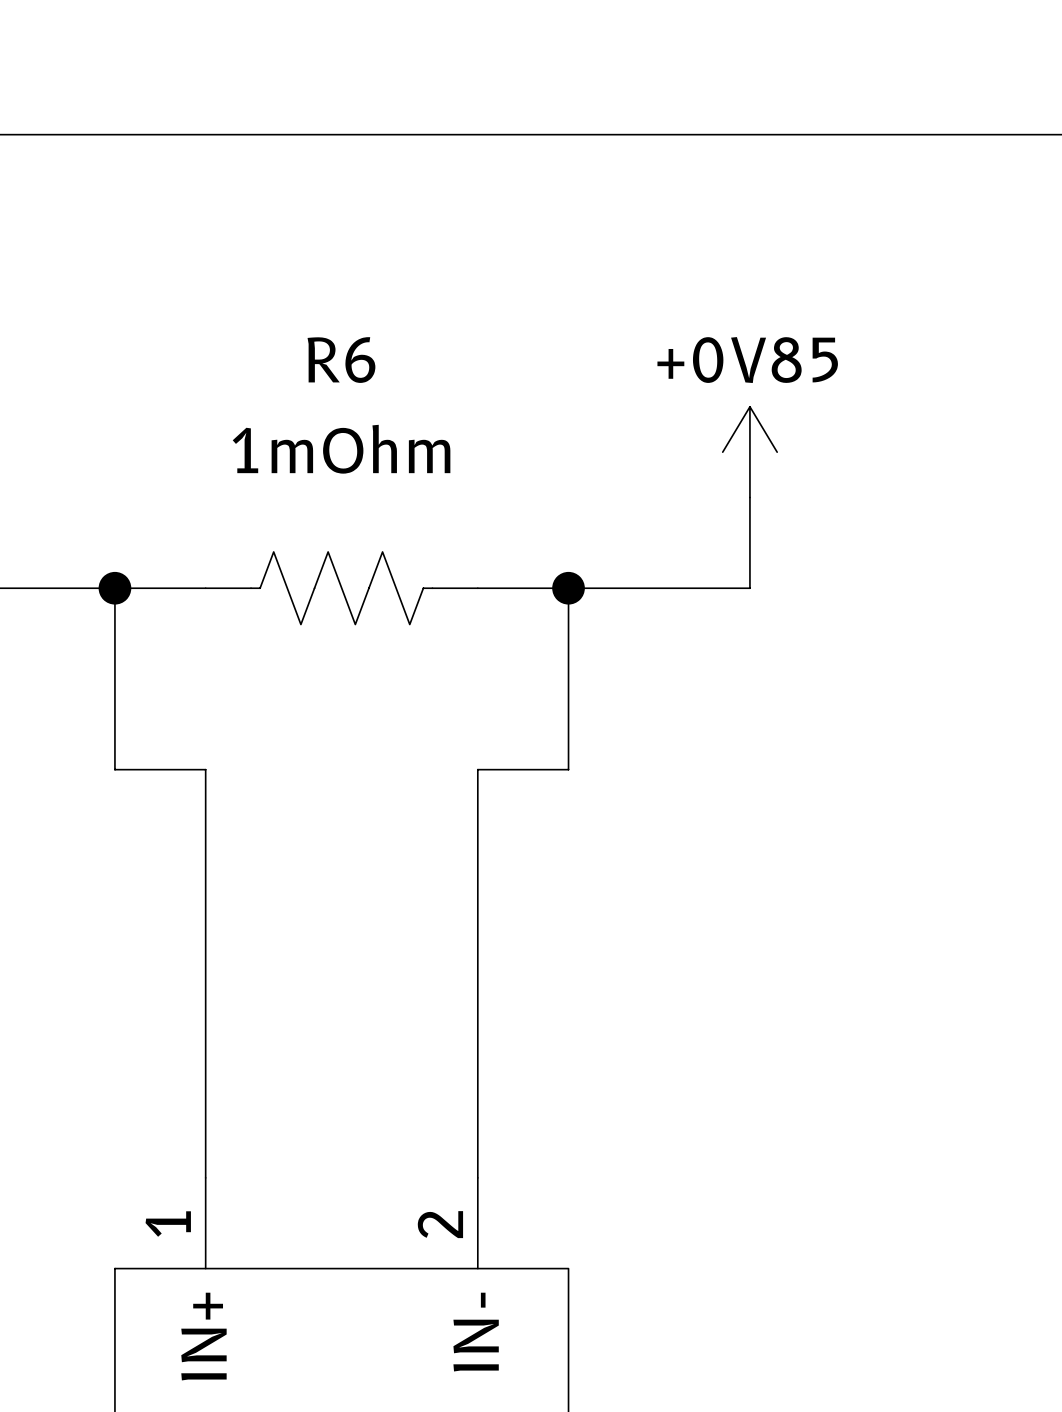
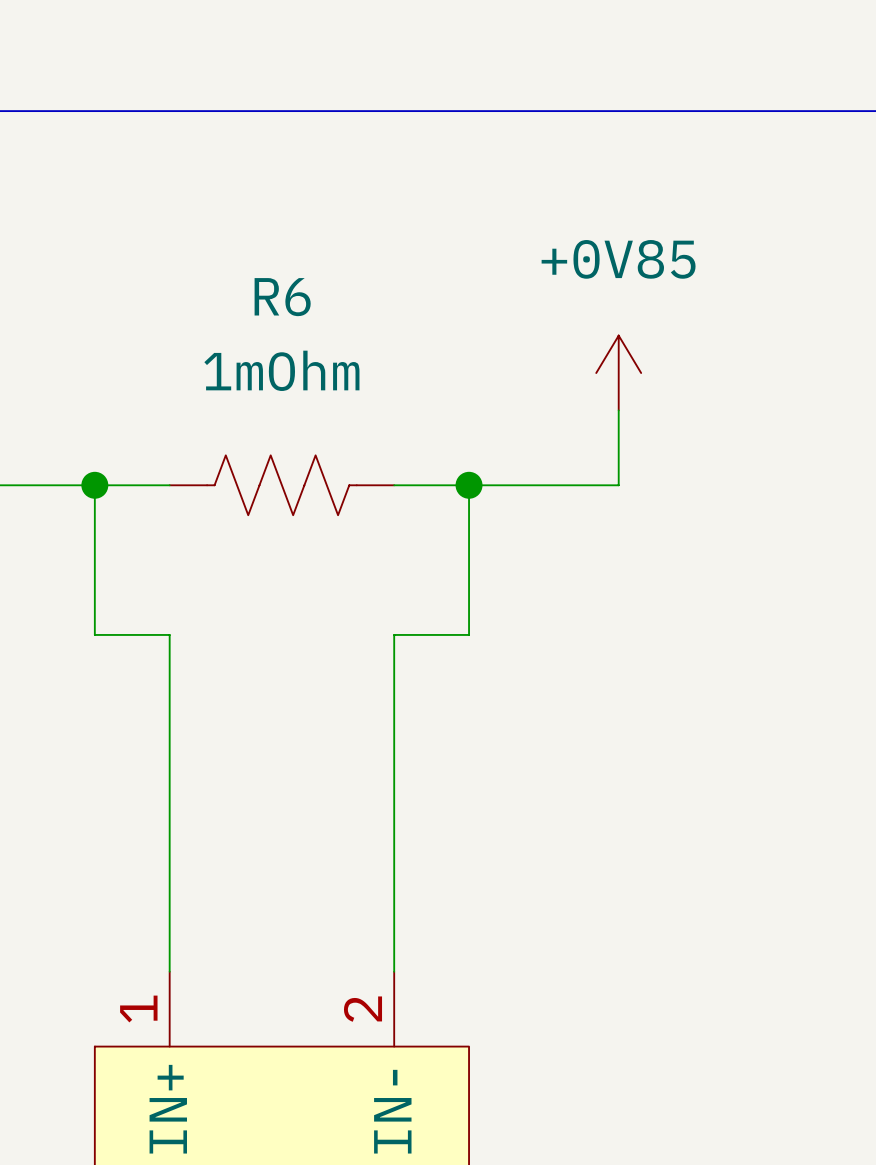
power symbol text position: +0V85 (747, 360) -> +0V85 (618, 259)

